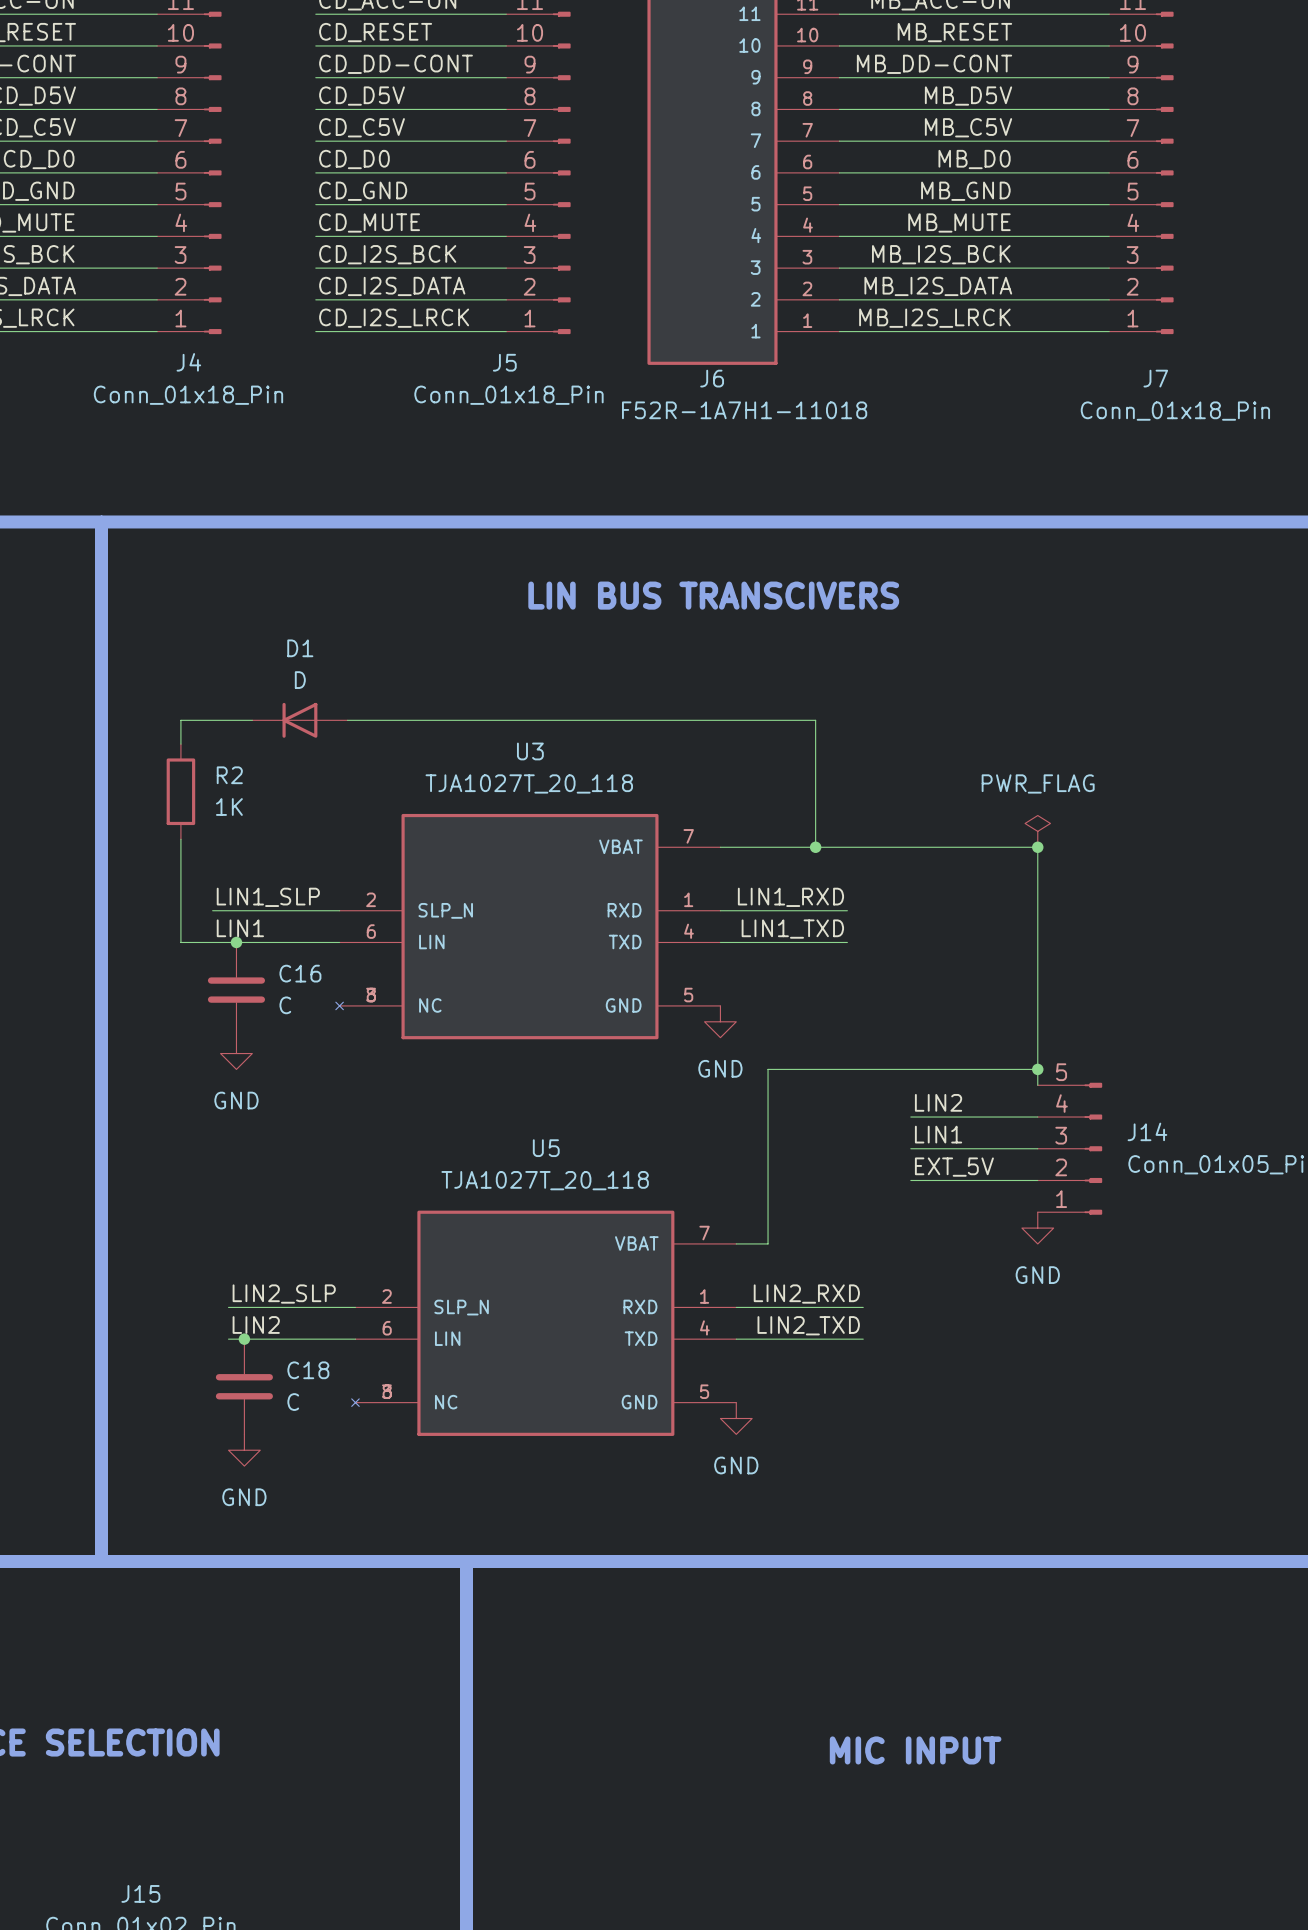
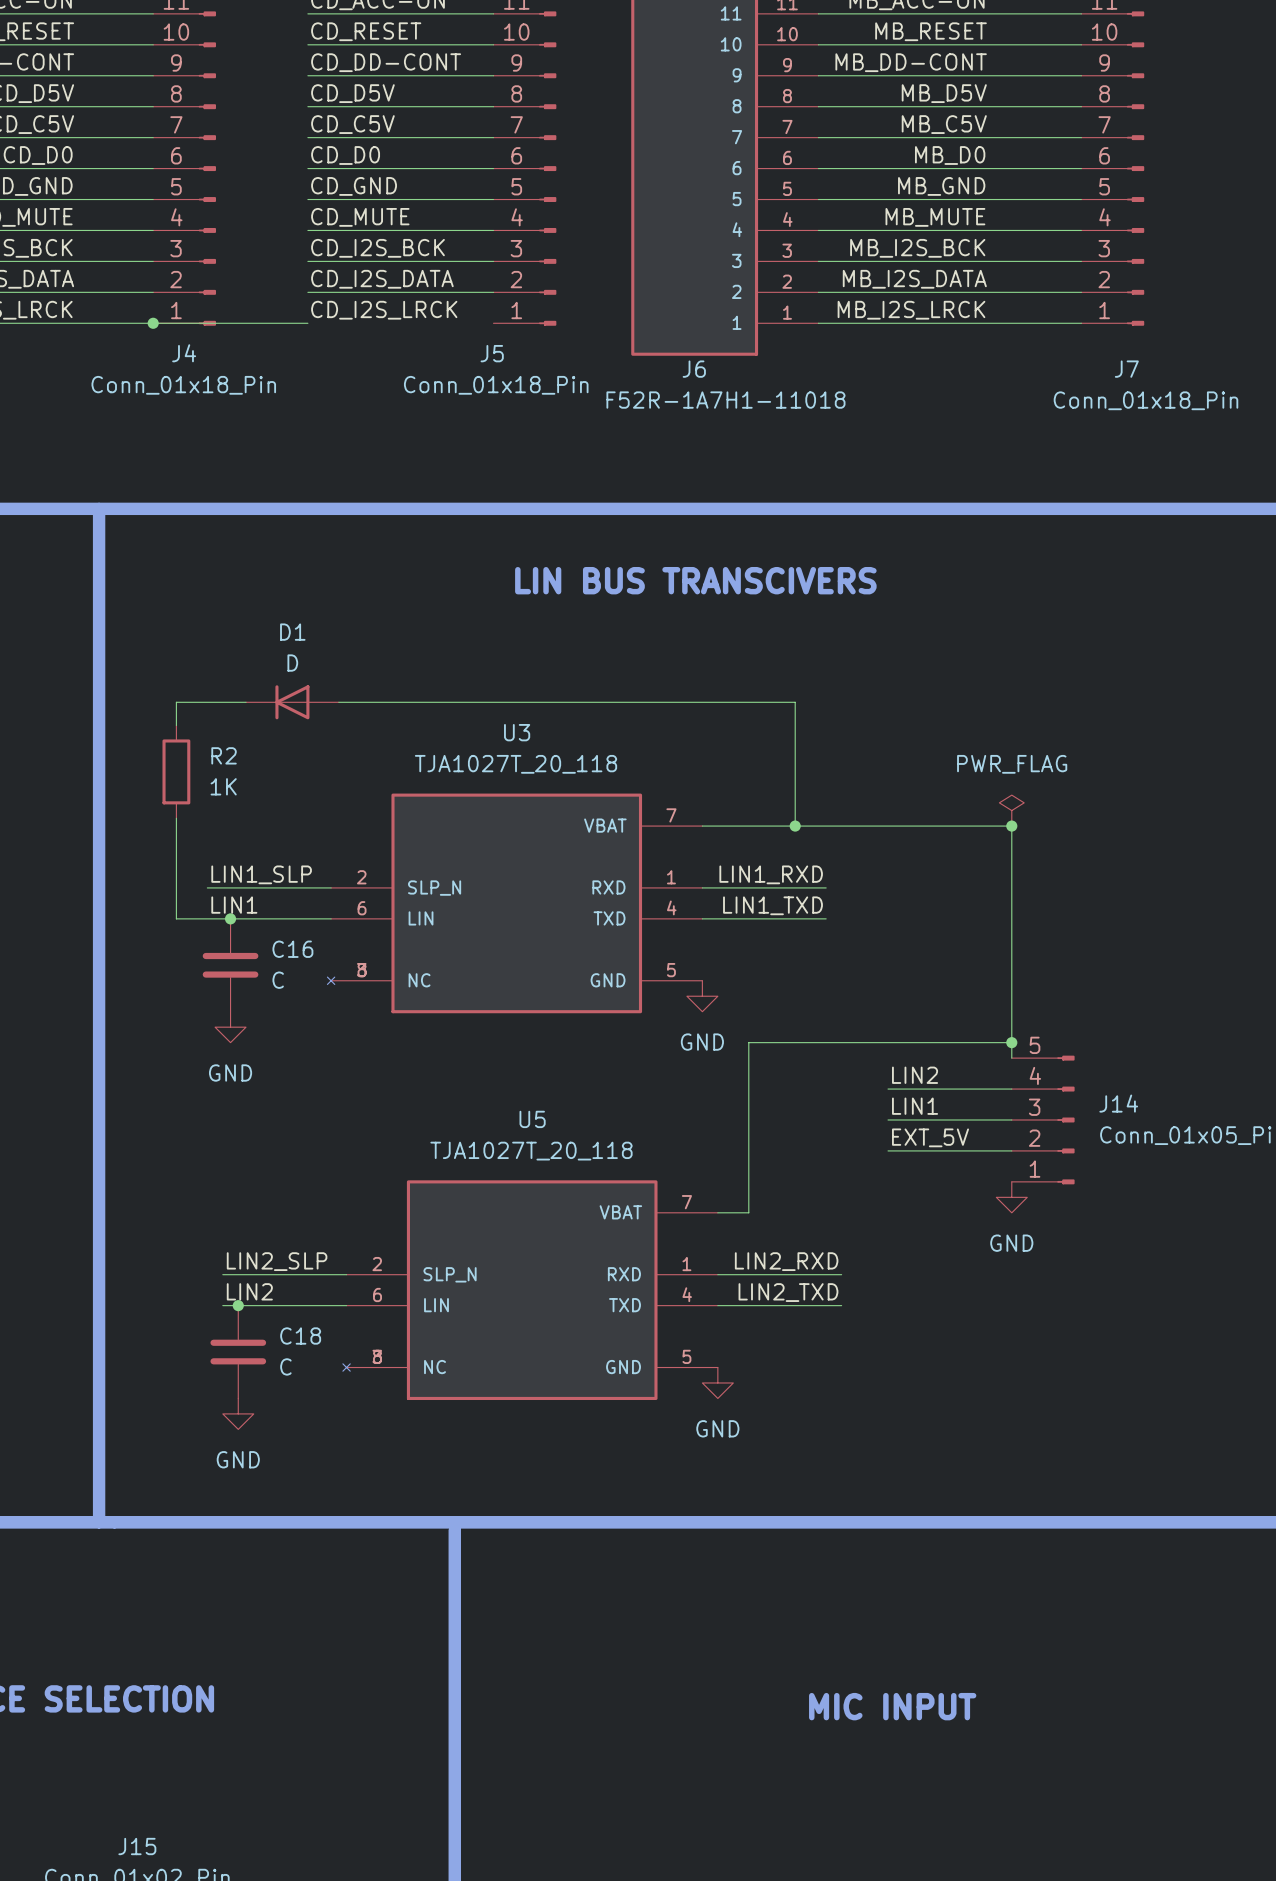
junction: none -> (153, 323)
wire: (315, 331) (506, 331) -> (307, 323) (153, 323)

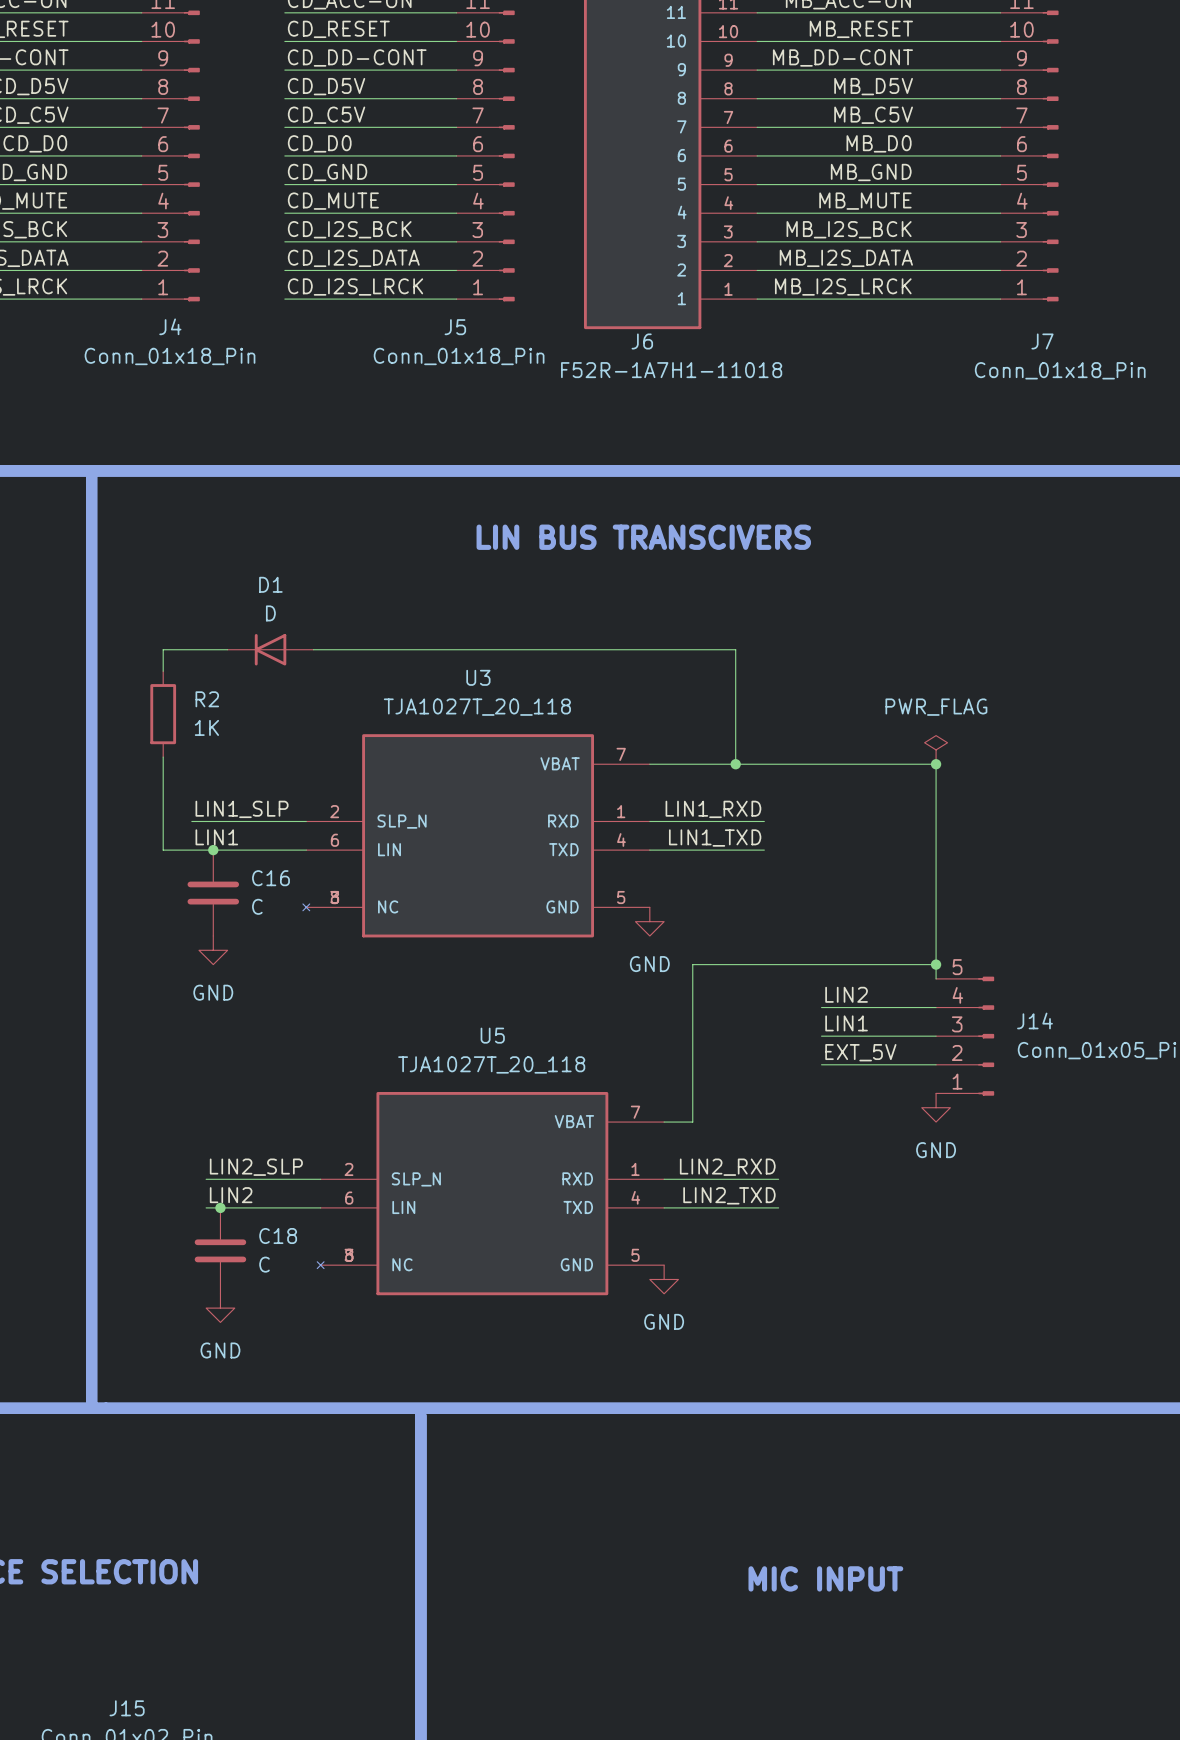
wire: (153, 323) (307, 323) -> (456, 299) (284, 299)
junction: (153, 323) -> none

